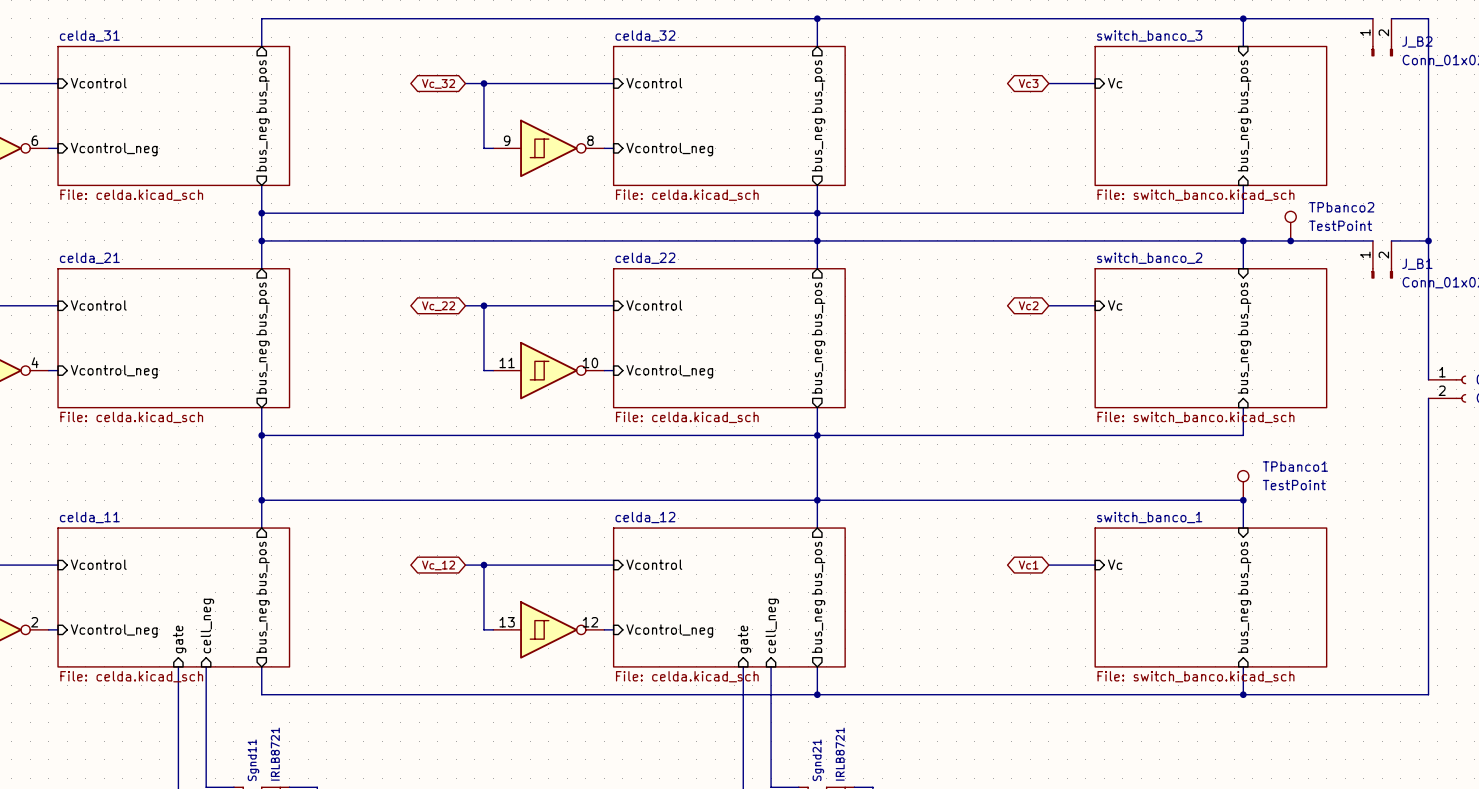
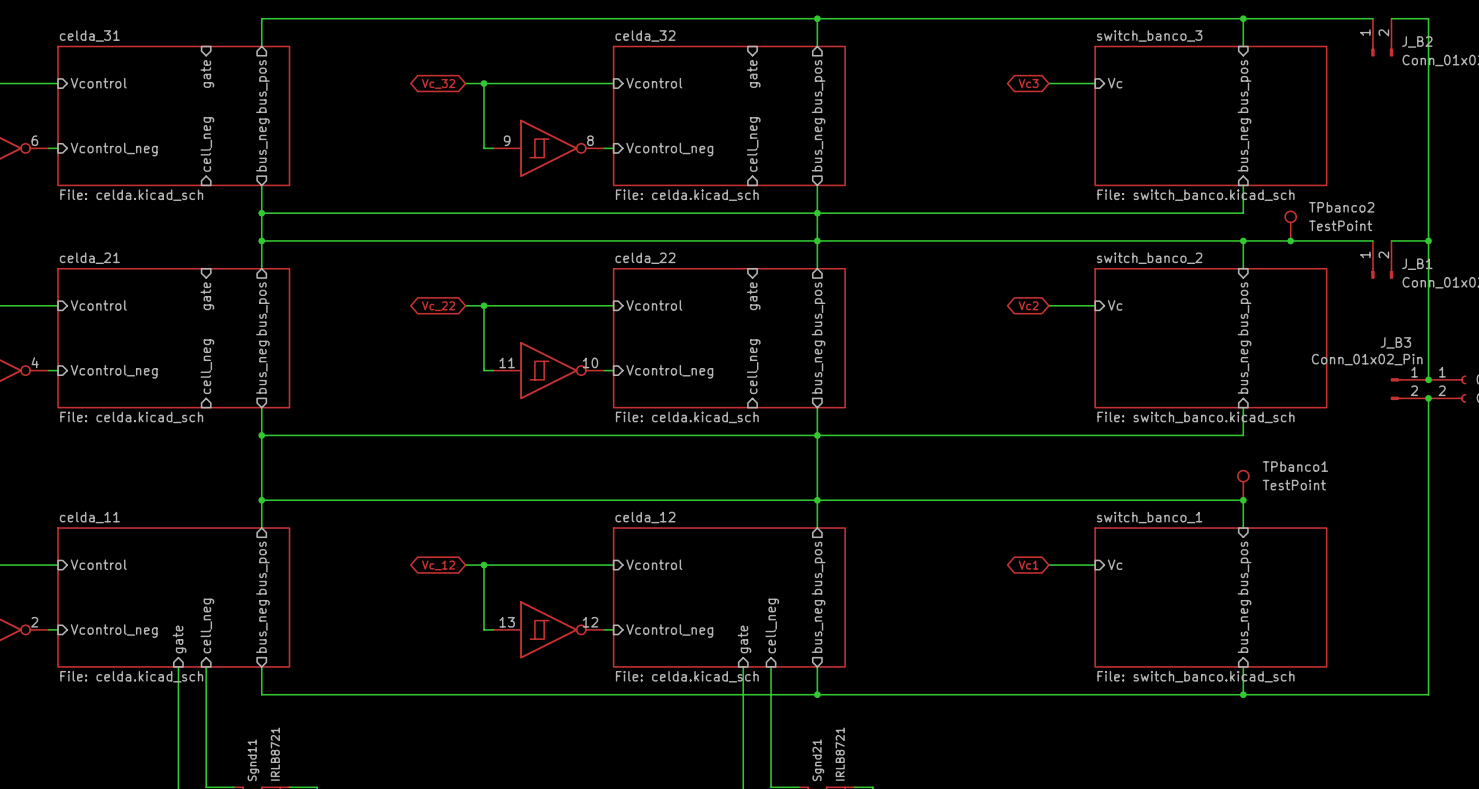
sheet pin: none -> gate (207, 73)
sheet pin: none -> gate (753, 73)
sheet pin: none -> cell_neg (207, 144)
sheet pin: none -> cell_neg (753, 144)
sheet pin: none -> gate (207, 296)
sheet pin: none -> gate (753, 296)
sheet pin: none -> cell_neg (207, 366)
sheet pin: none -> cell_neg (753, 366)
junction: none -> (1428, 379)
J_B3: none -> Conn_01x02_Pin (1409, 389)
junction: none -> (1428, 398)

